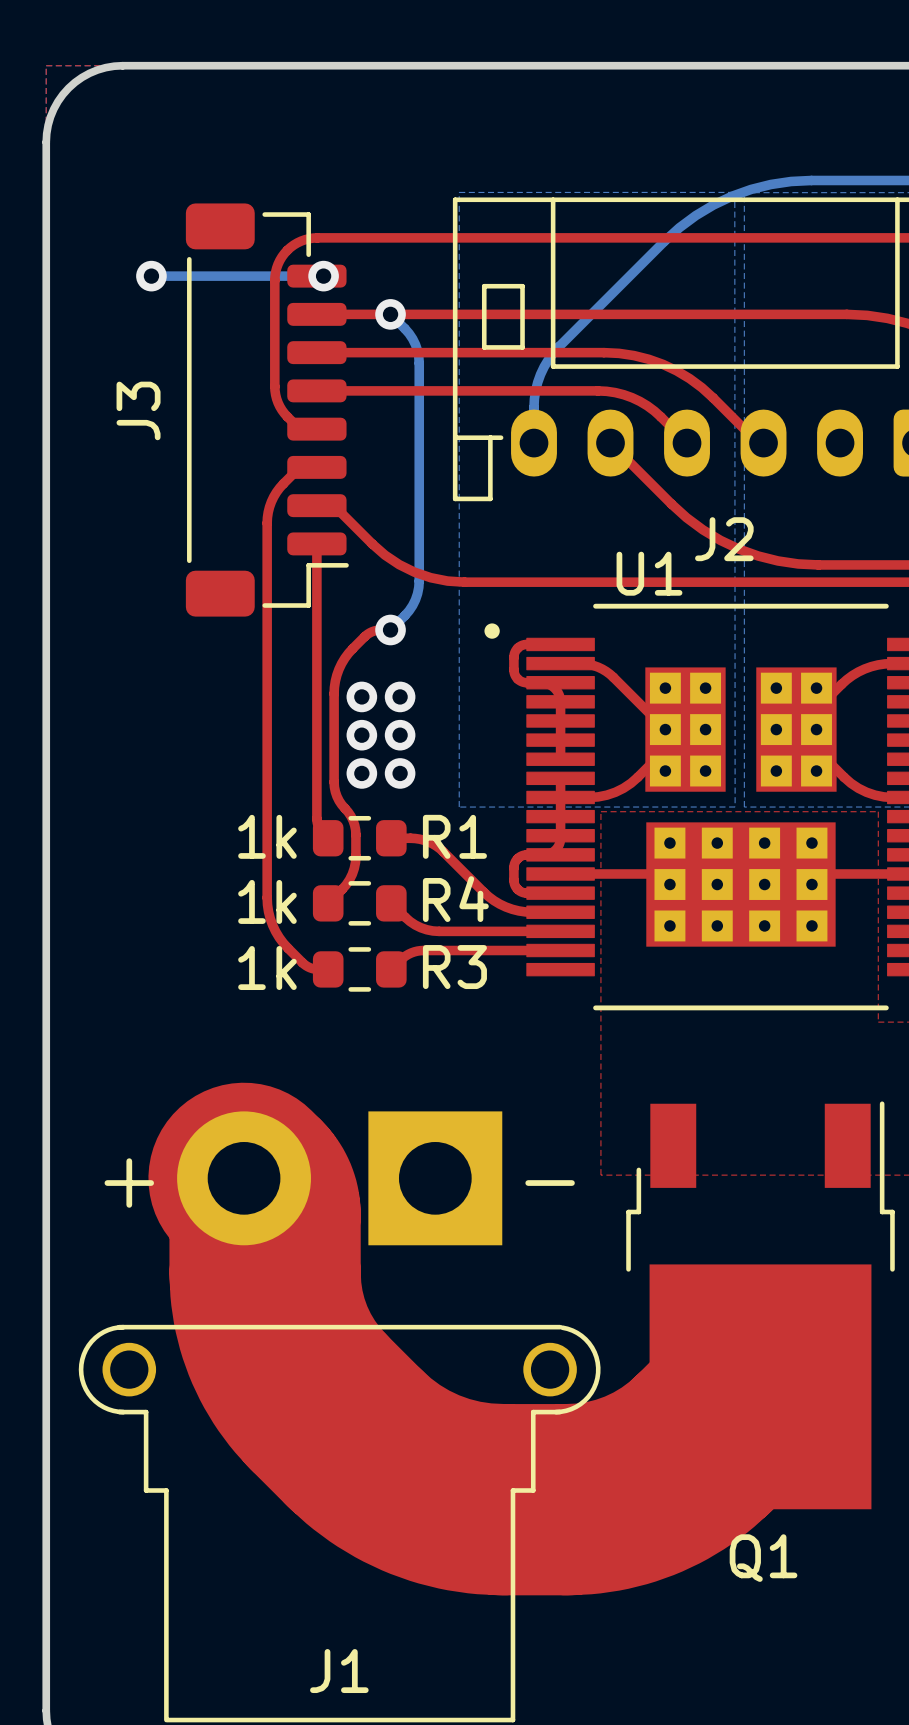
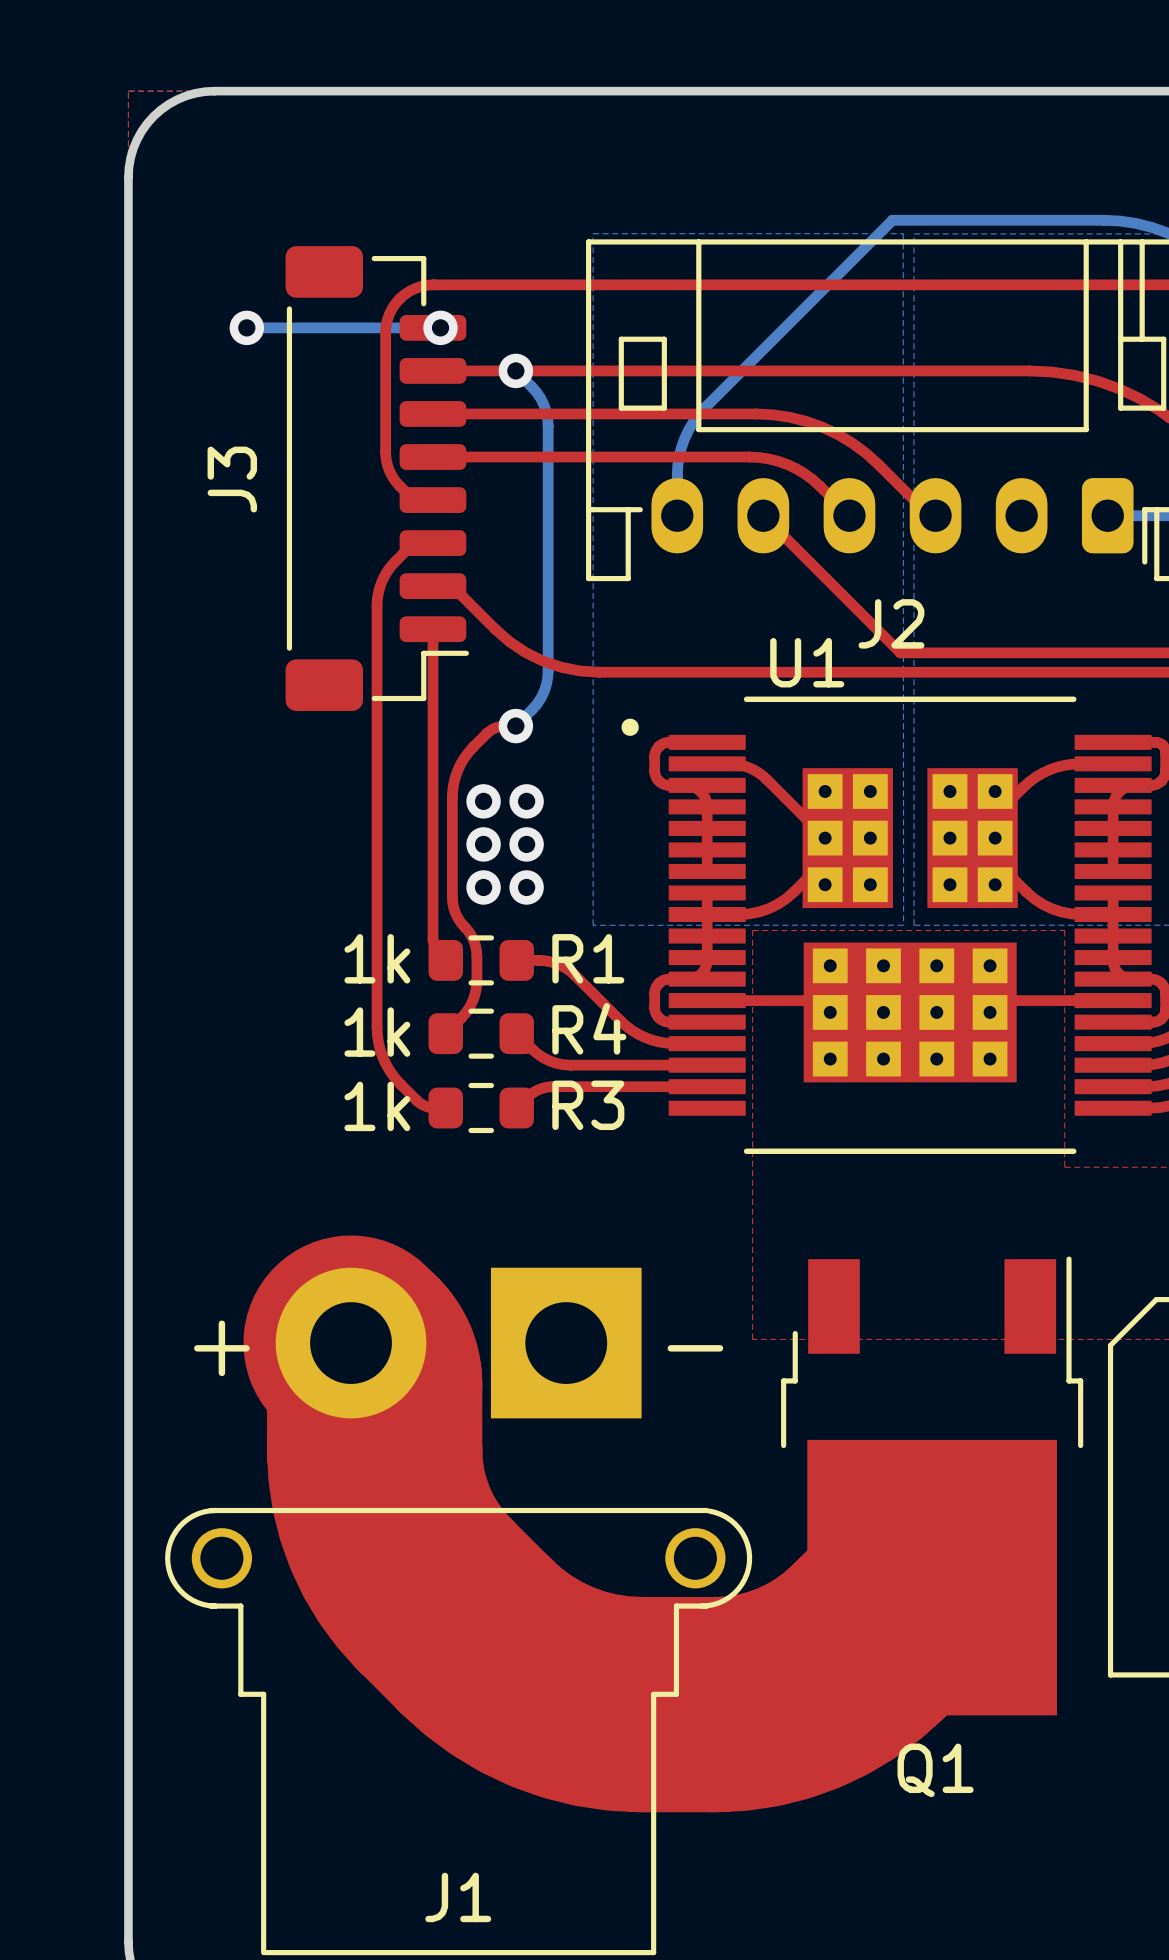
bottom track: (811, 180) (770, 184) (731, 196) (695, 215) (664, 241) -> (989, 220) (892, 220) (823, 288)
top track: (671, 504) (702, 529) (738, 549) (778, 560) (818, 564) -> (831, 584) (900, 652) (997, 652)

